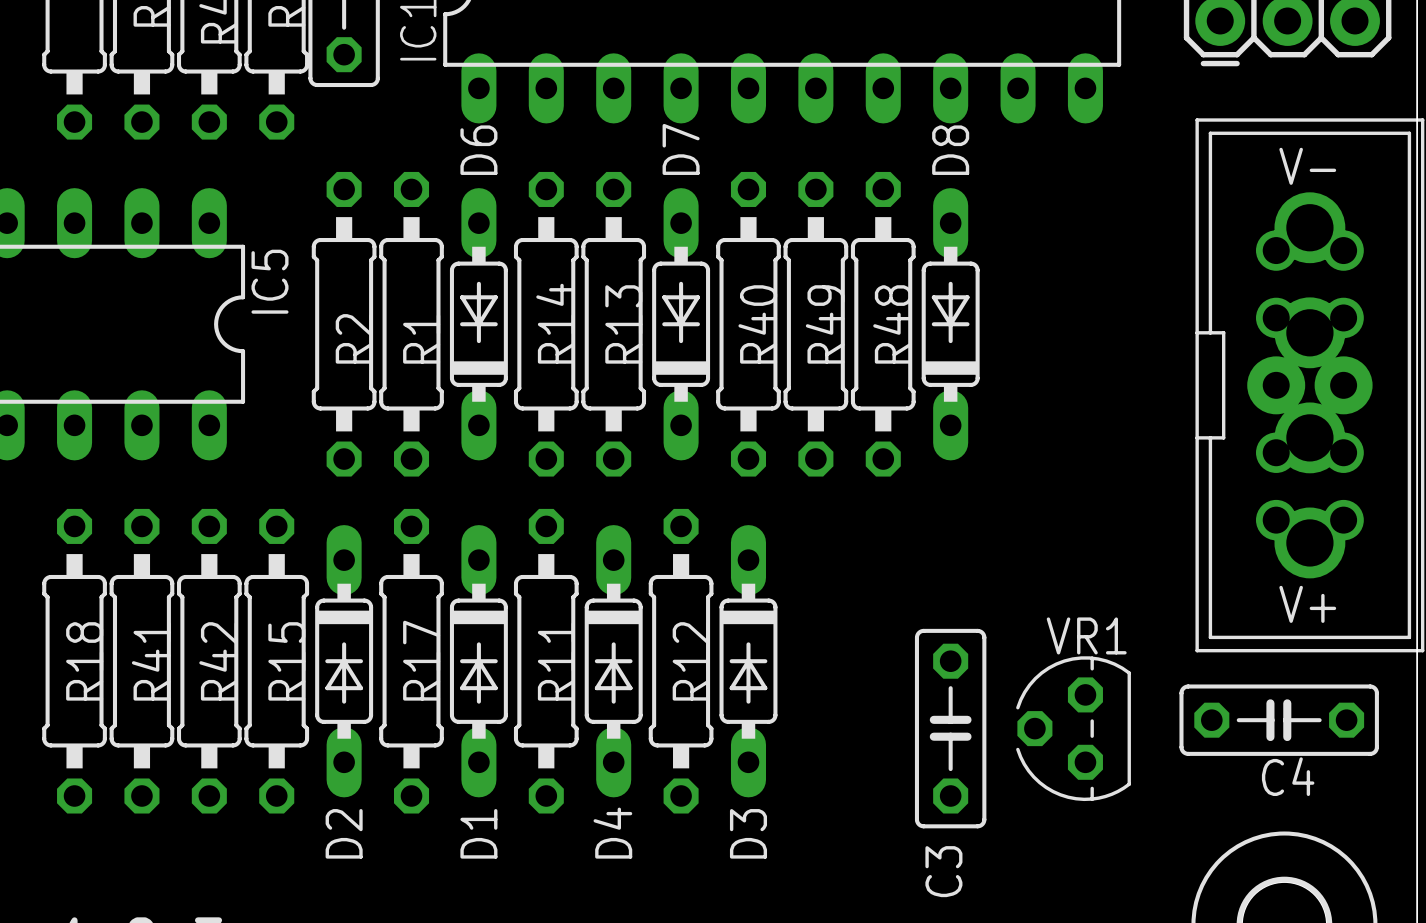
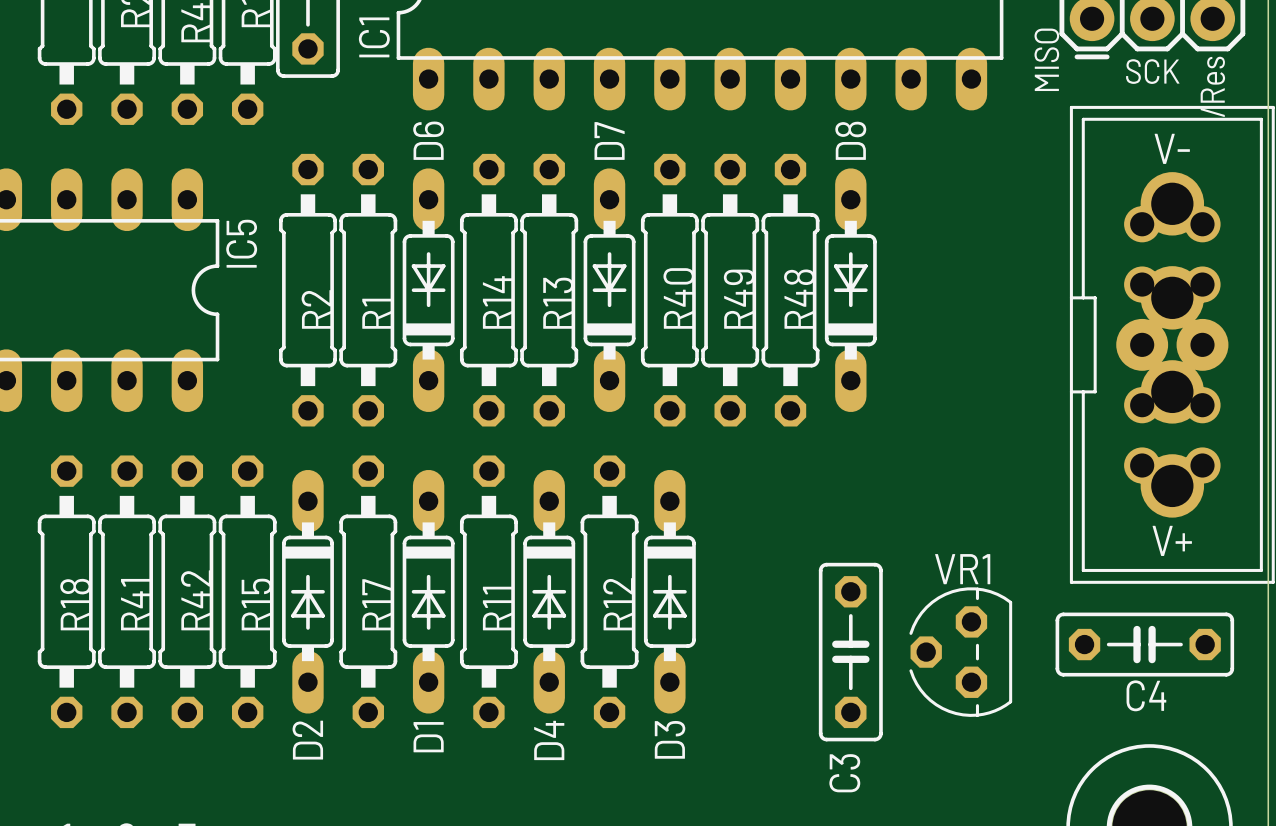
text: none -> MISO (1046, 59)
text: none -> SCK (1152, 71)
text: none -> /Res (1212, 86)

